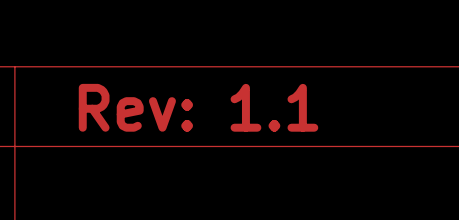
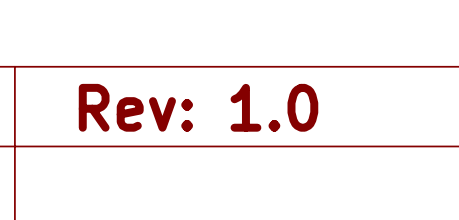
title block: Rev: 1.1 (198, 107) -> Rev: 1.0 (198, 107)

